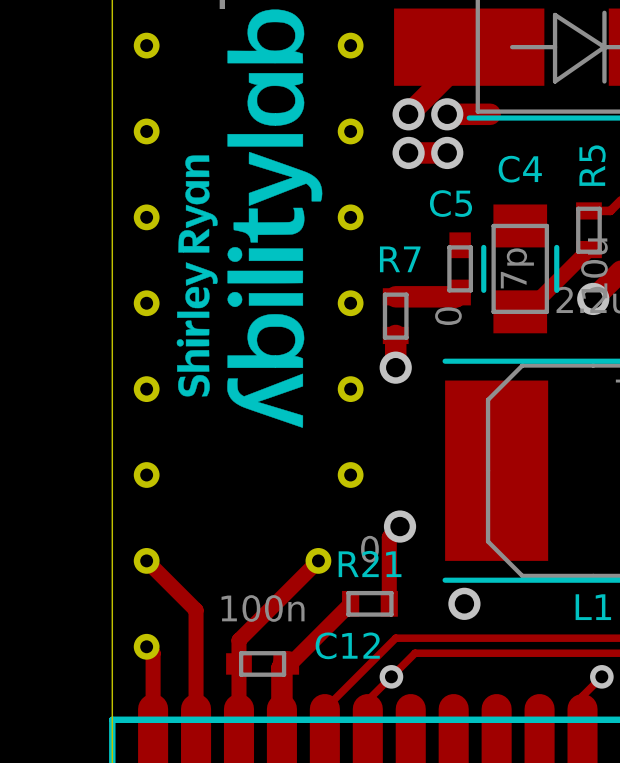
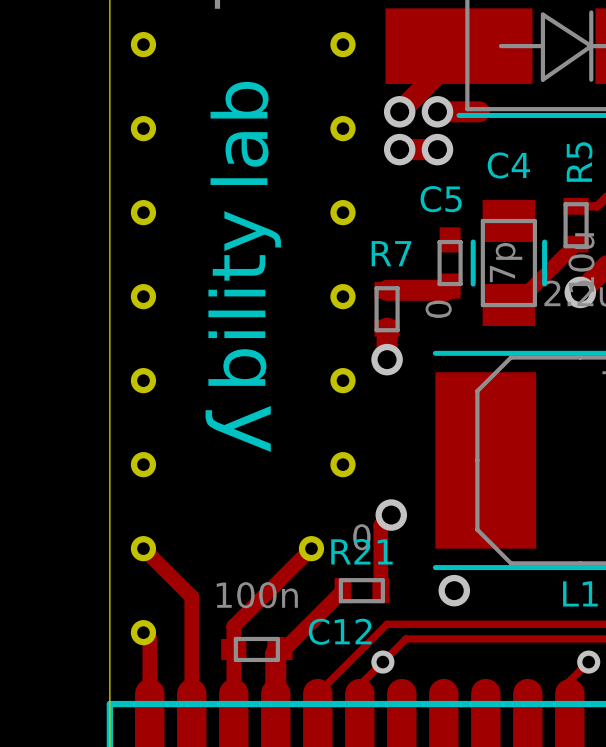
drawing: [176, 9, 323, 428] -> none
text: none -> lab (239, 133)
text: none -> bility (244, 298)
text: none -> y (238, 428)

